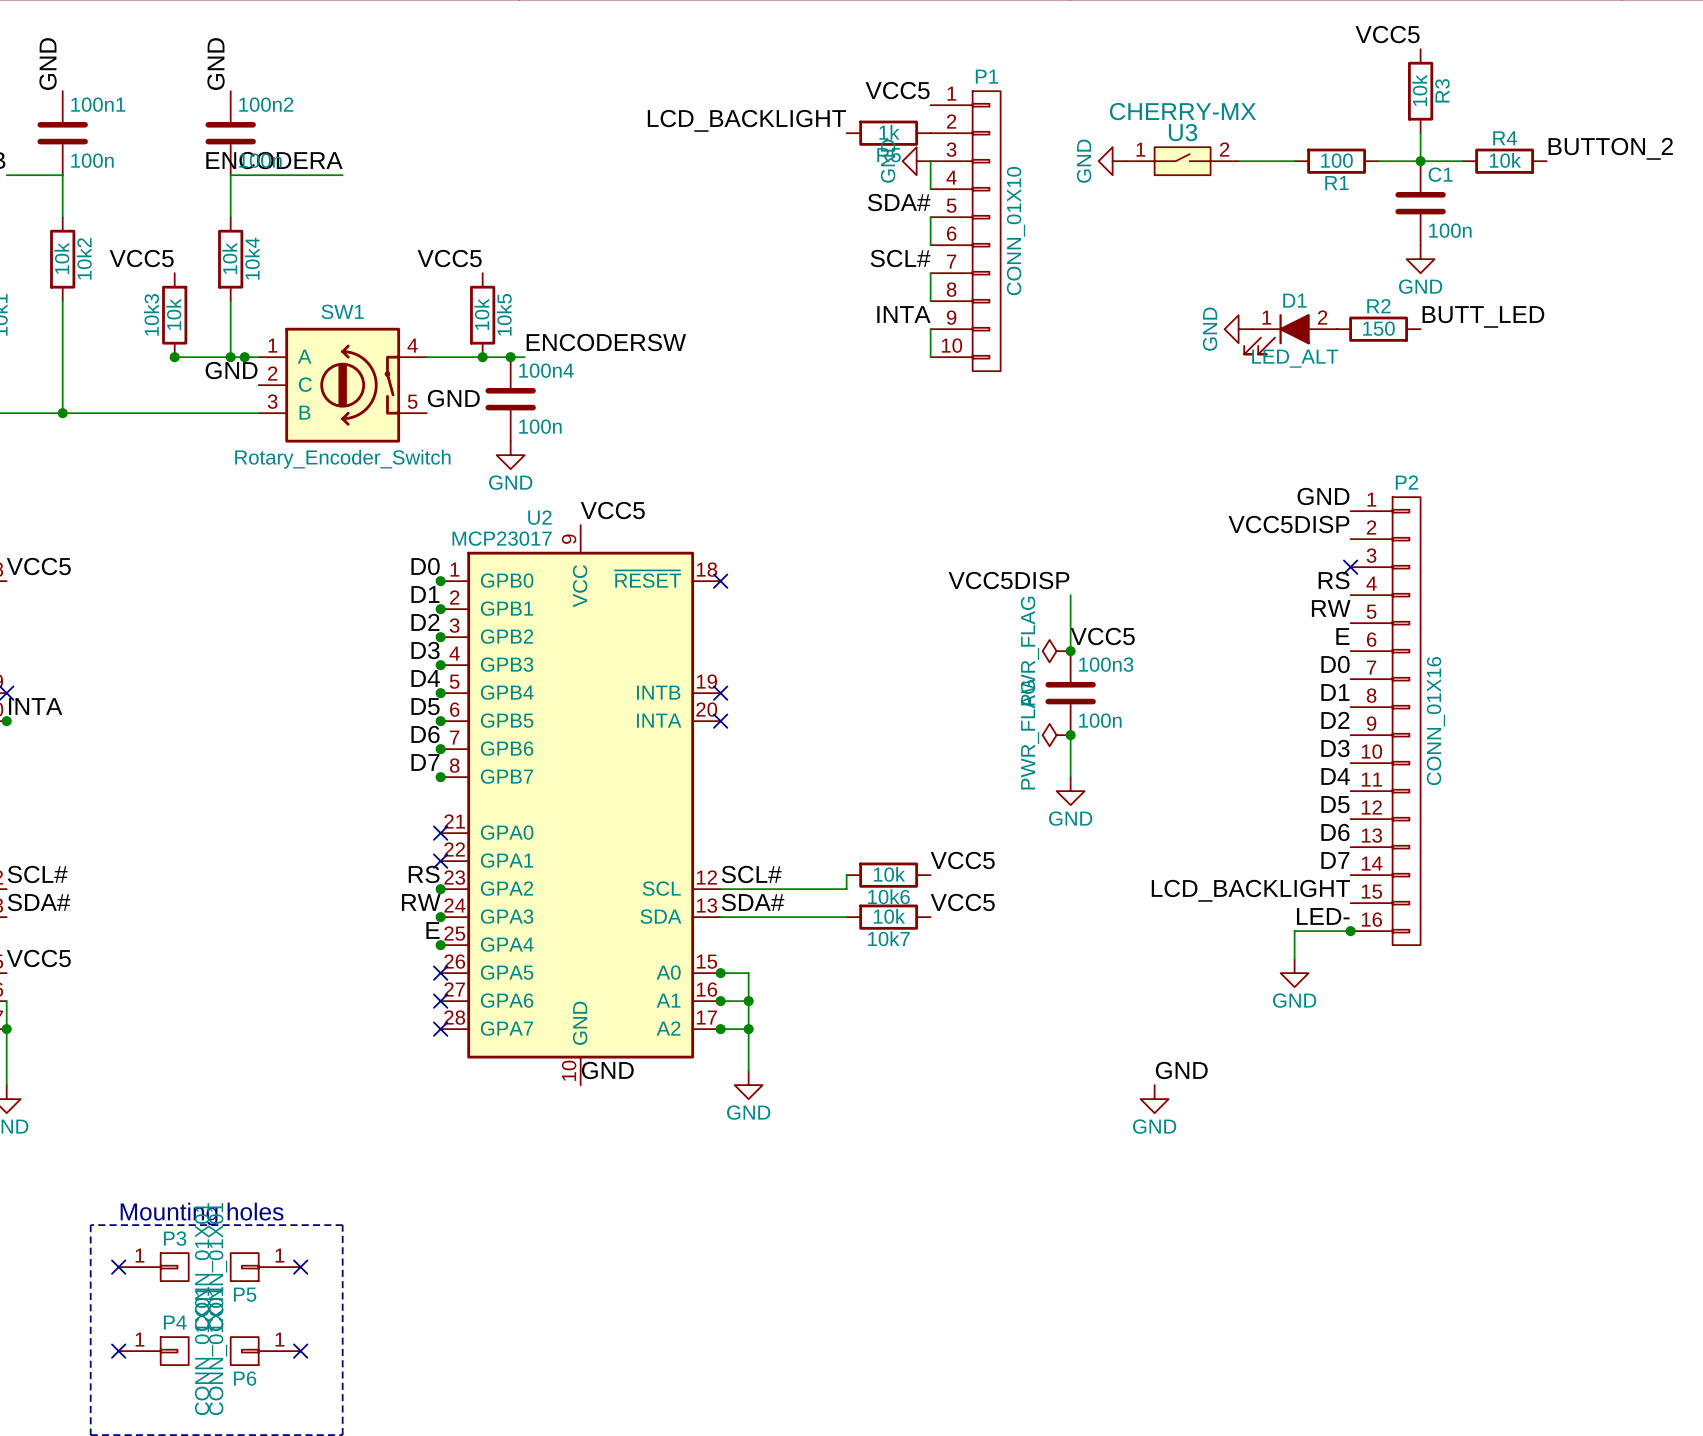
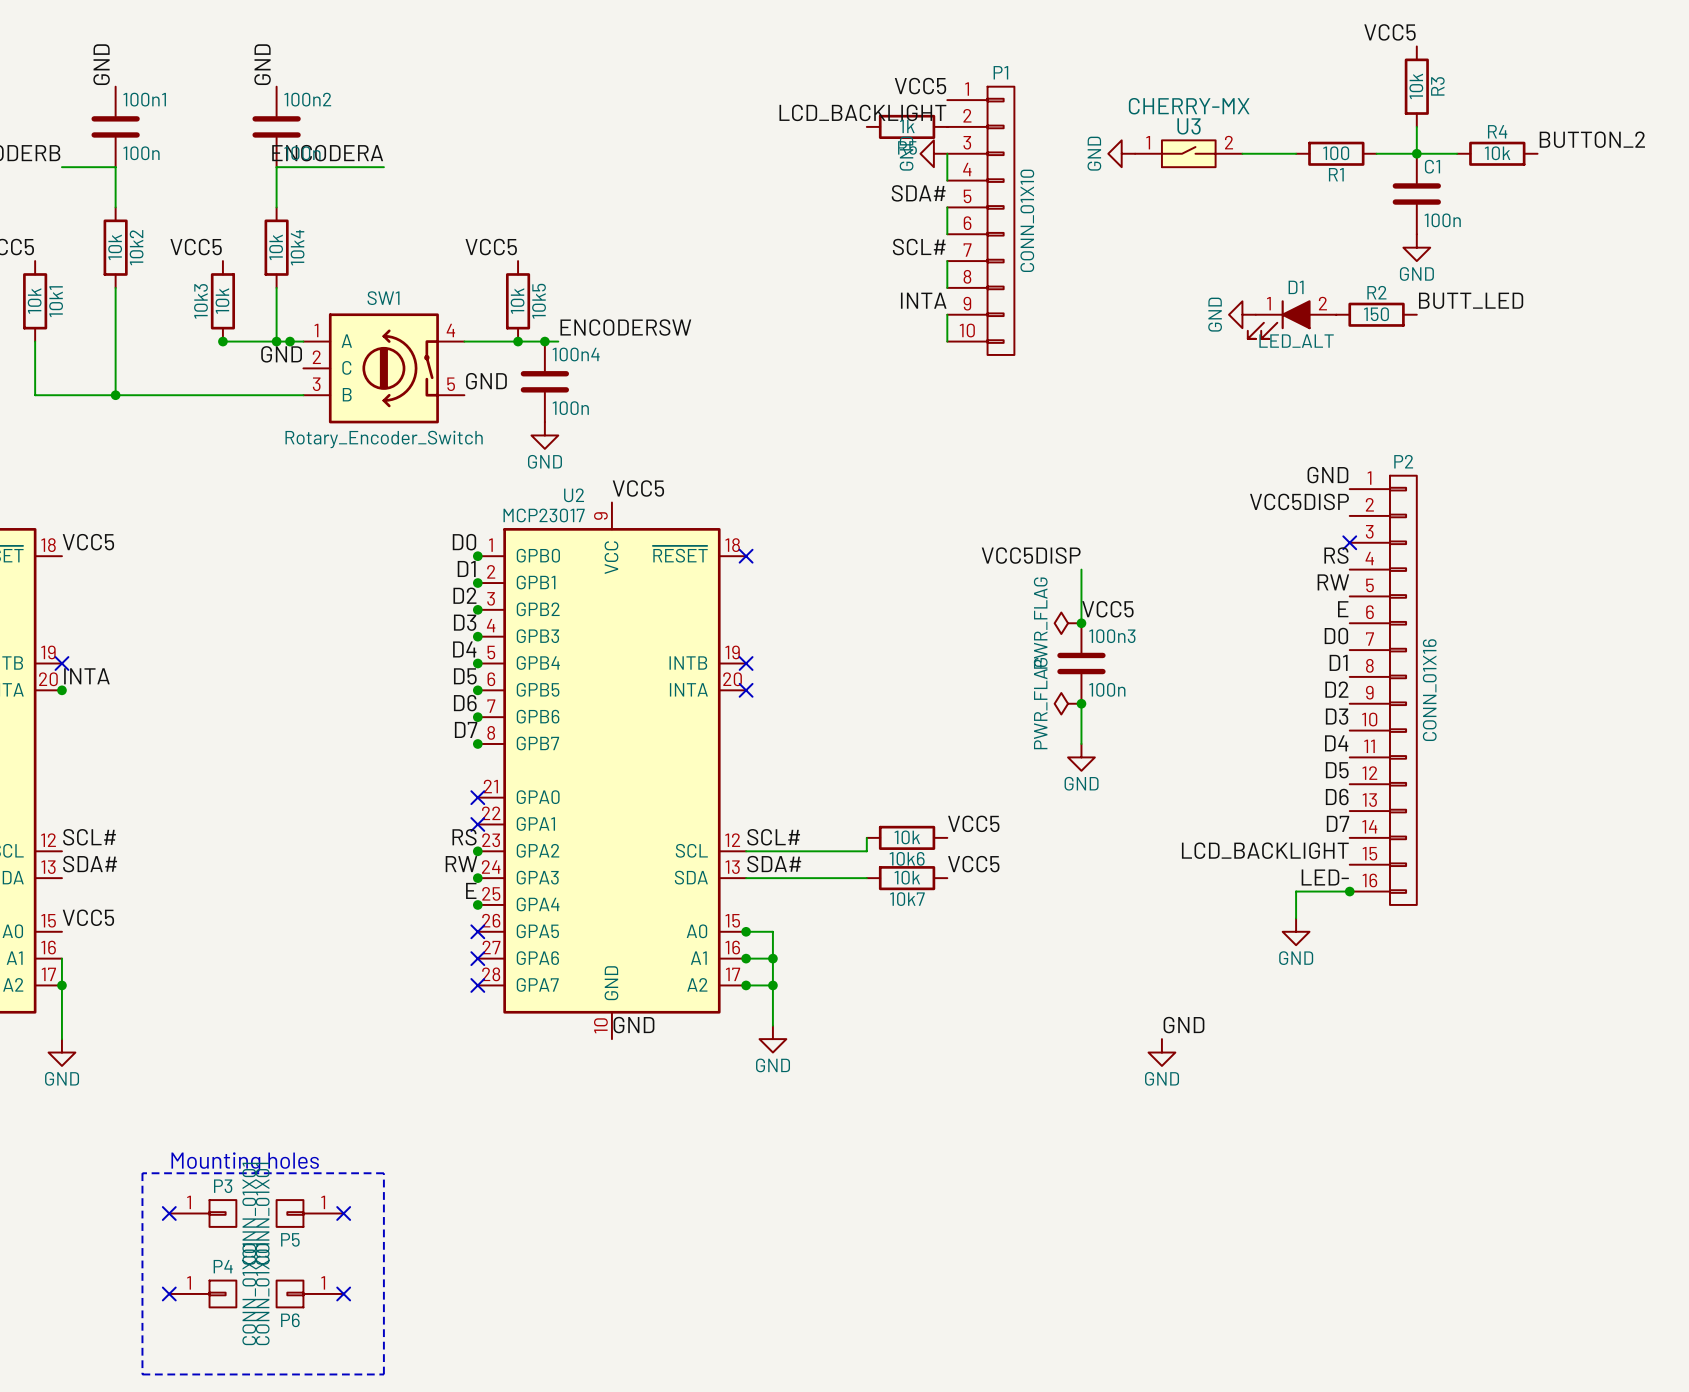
label position: LCD_BACKLIGHT (746, 120) -> LCD_BACKLIGHT (862, 112)

